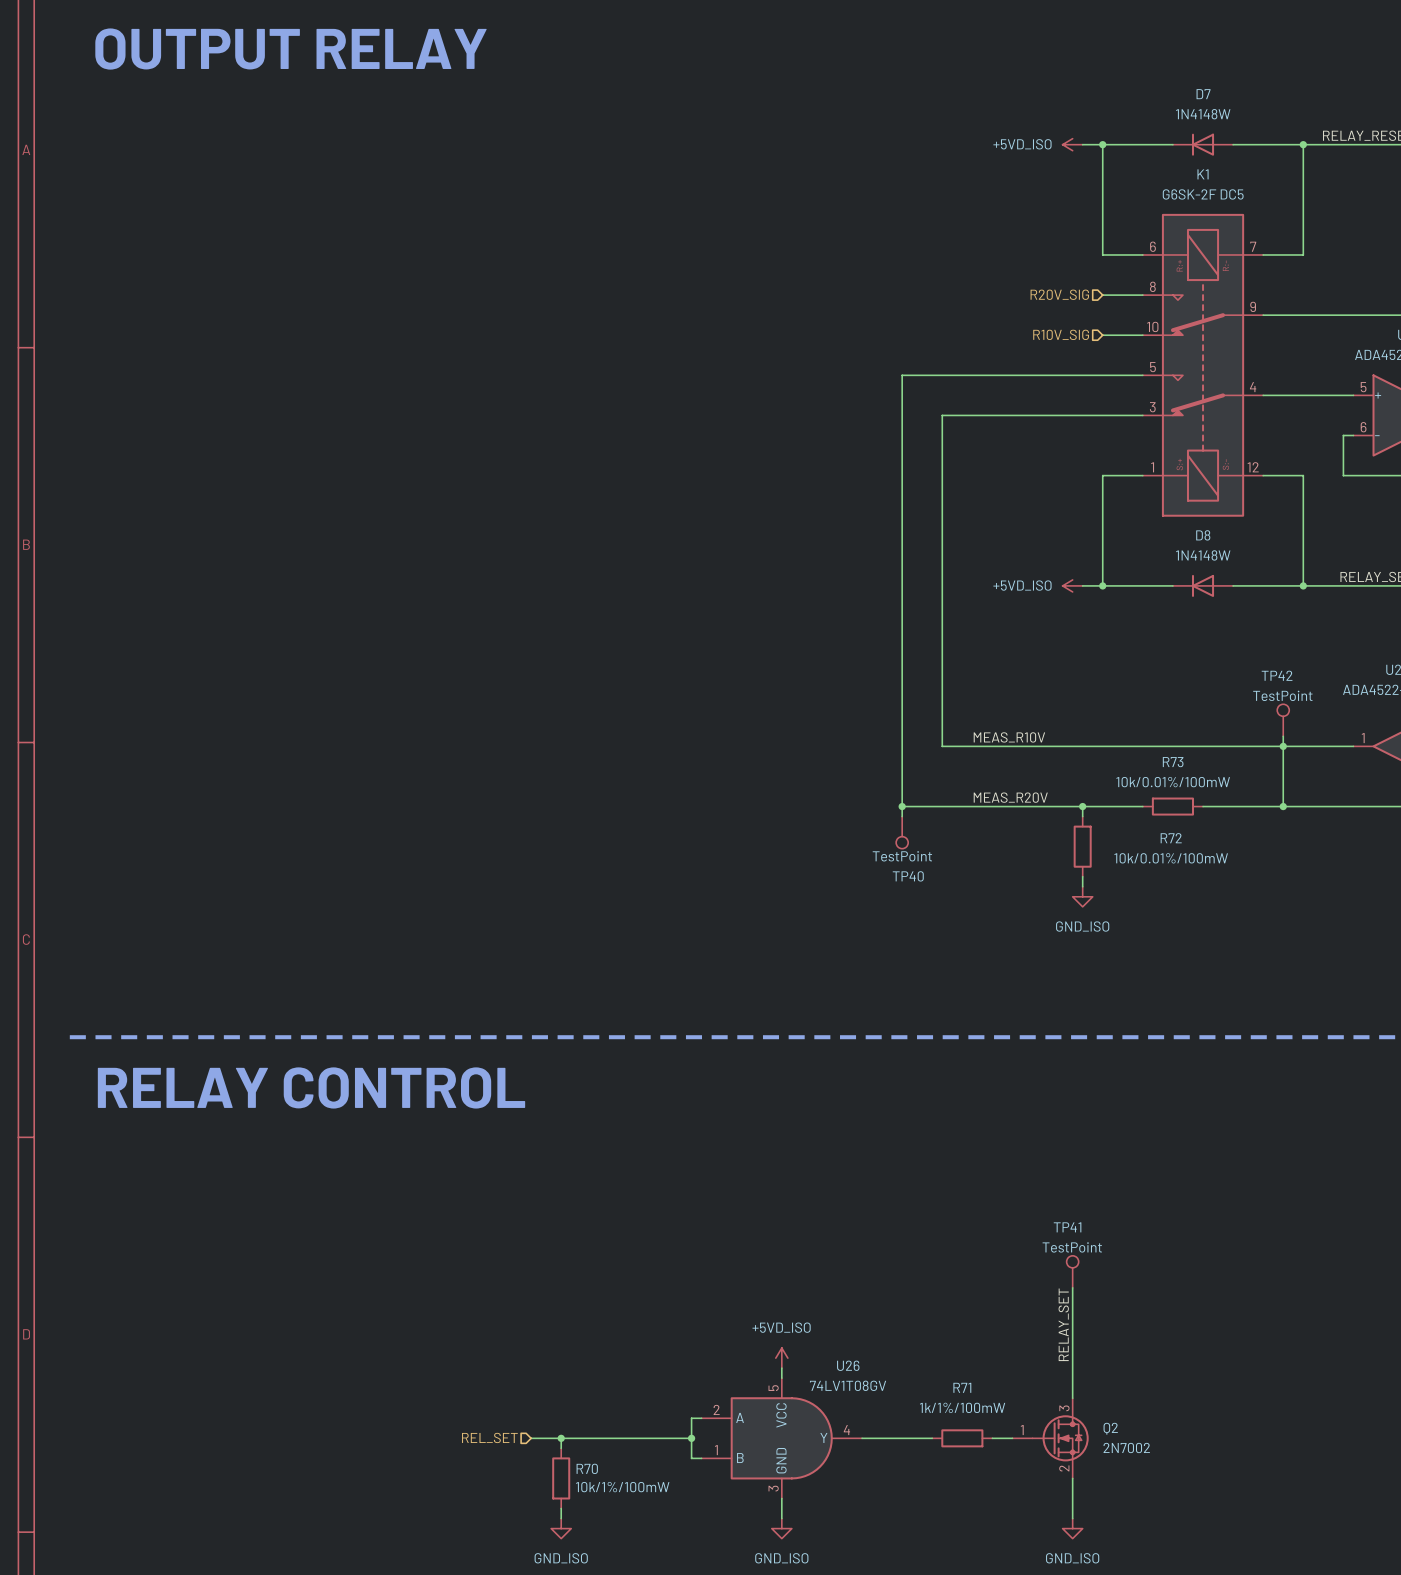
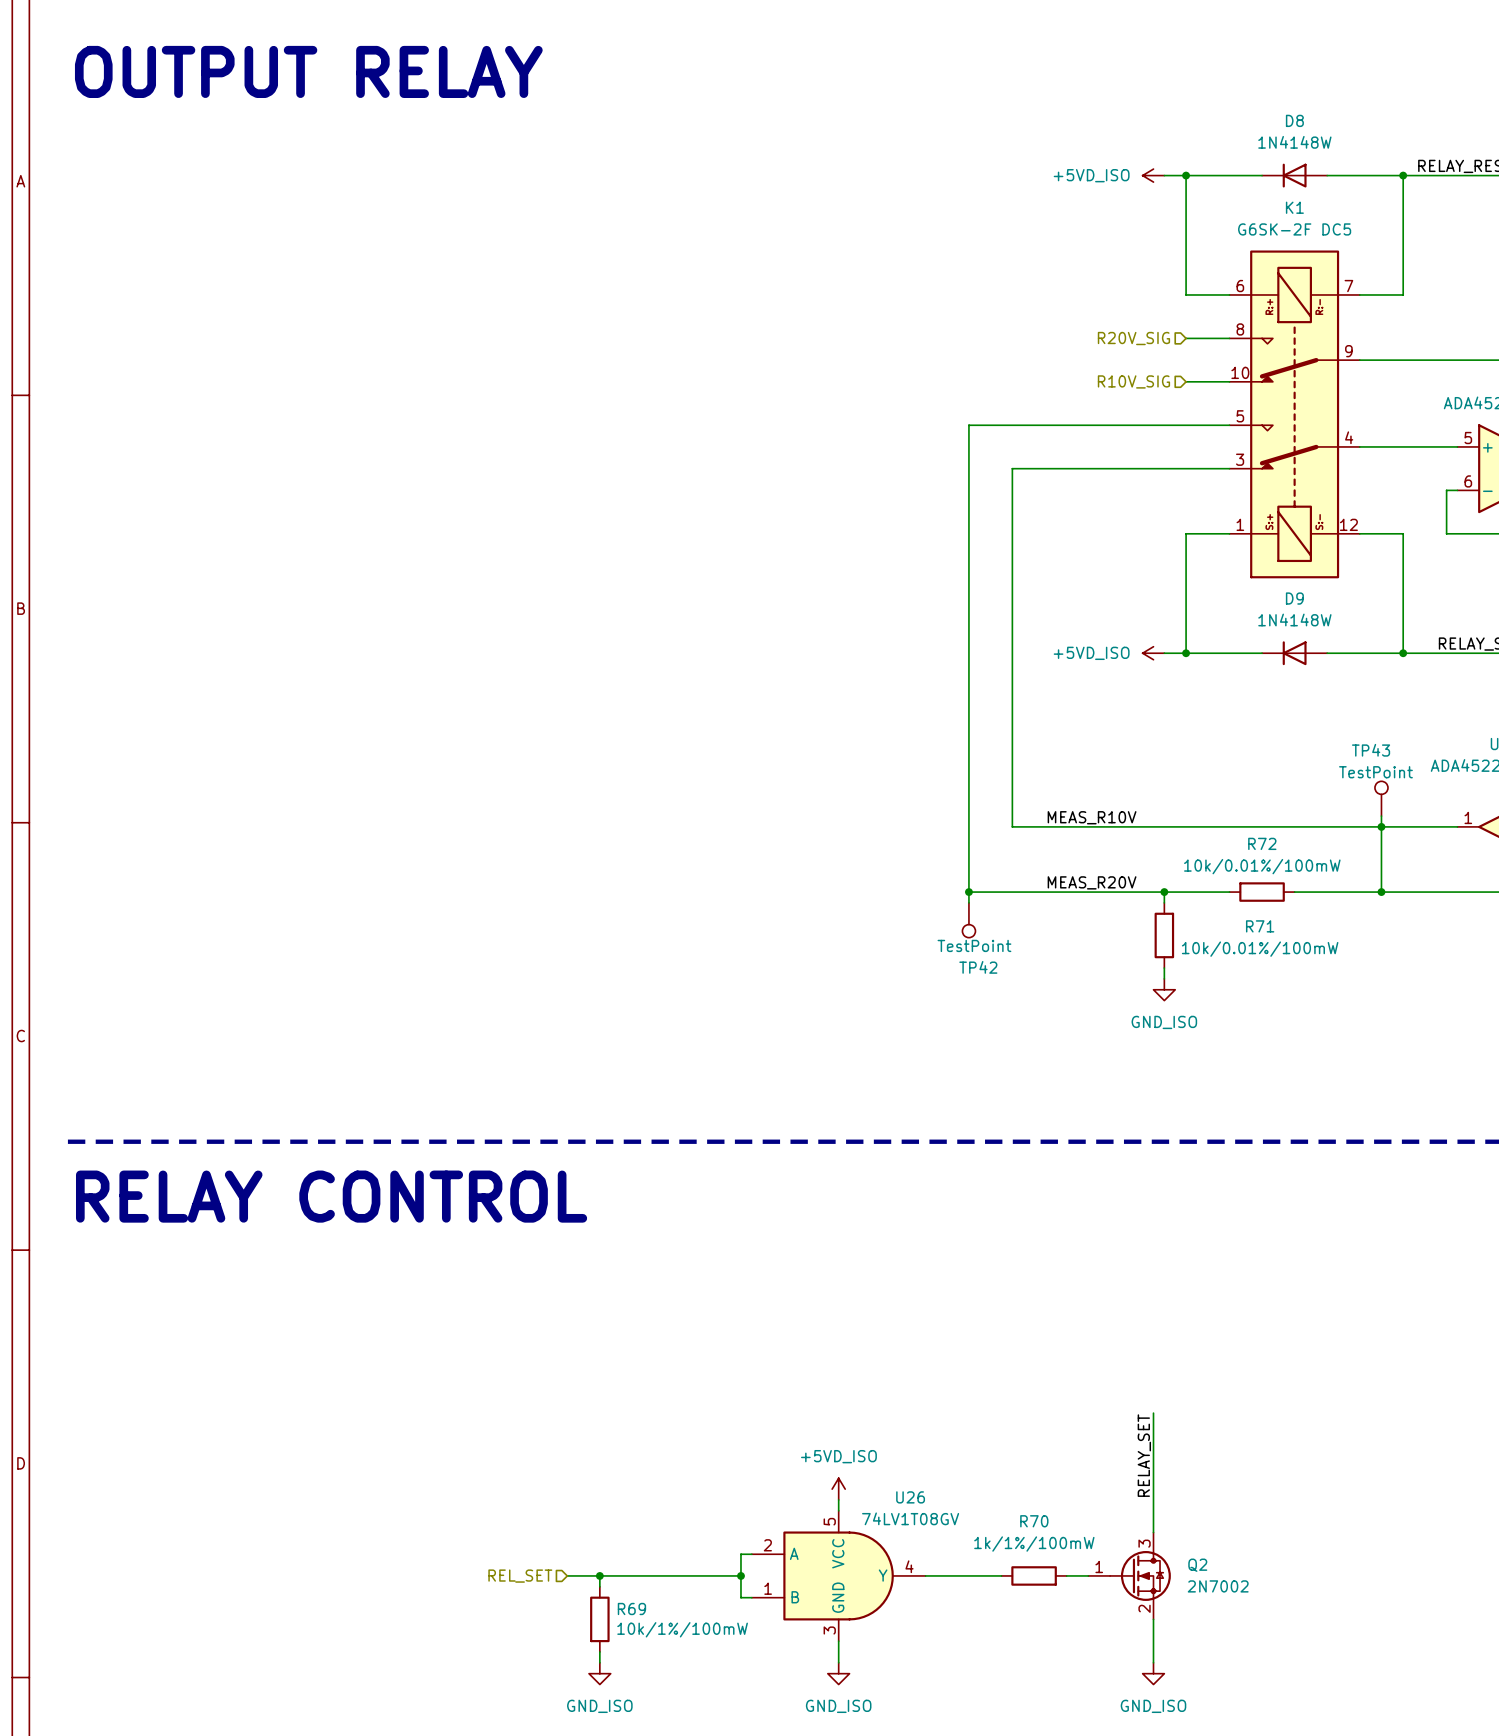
D7 name: D7 (1203, 94) -> D8 (1294, 120)
D8 name: D8 (1203, 535) -> D9 (1294, 598)
TP42 name: TP42 (1277, 675) -> TP43 (1371, 750)
R73 name: R73 (1173, 762) -> R72 (1262, 843)
R72 name: R72 (1171, 838) -> R71 (1260, 926)
TP40 name: TP40 (908, 876) -> TP42 (978, 967)
TP41: TestPoint (1072, 1271) -> none
R71 name: R71 (962, 1387) -> R70 (1034, 1521)
R70 name: R70 (587, 1468) -> R69 (631, 1609)

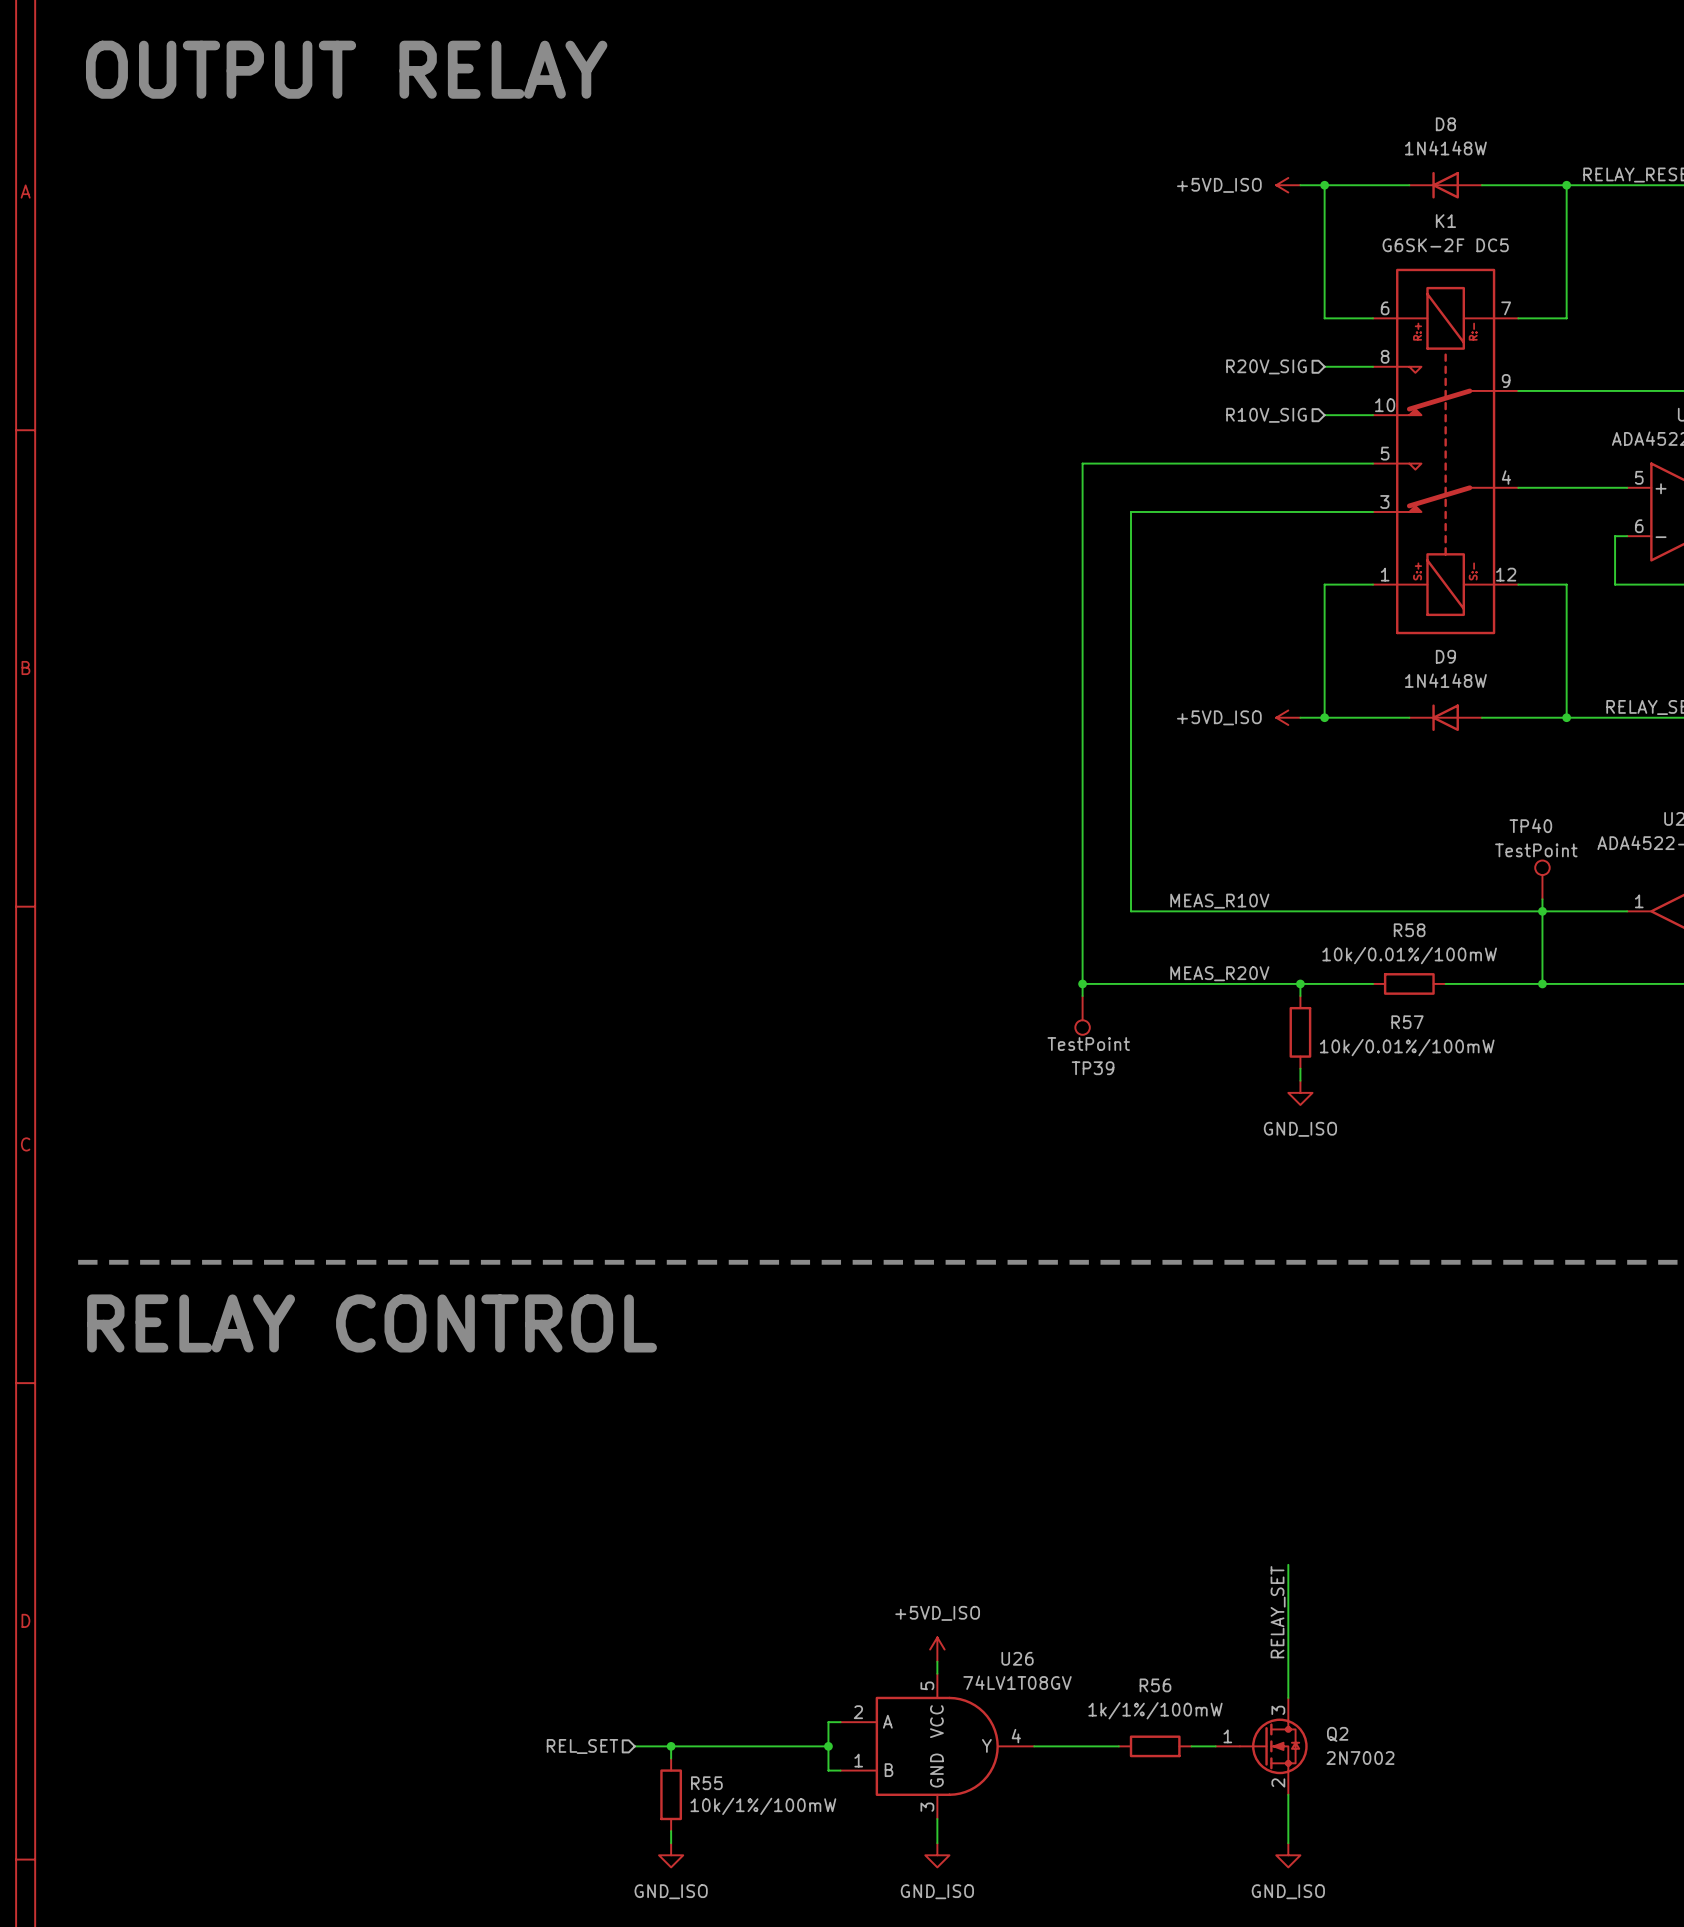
TP43 name: TP43 (1371, 750) -> TP40 (1530, 825)
R72 name: R72 (1262, 843) -> R58 (1409, 930)
R71 name: R71 (1260, 926) -> R57 (1407, 1022)
TP42 name: TP42 (978, 967) -> TP39 (1093, 1068)
R70 name: R70 (1034, 1521) -> R56 (1155, 1685)
R69 name: R69 (631, 1609) -> R55 (706, 1783)

